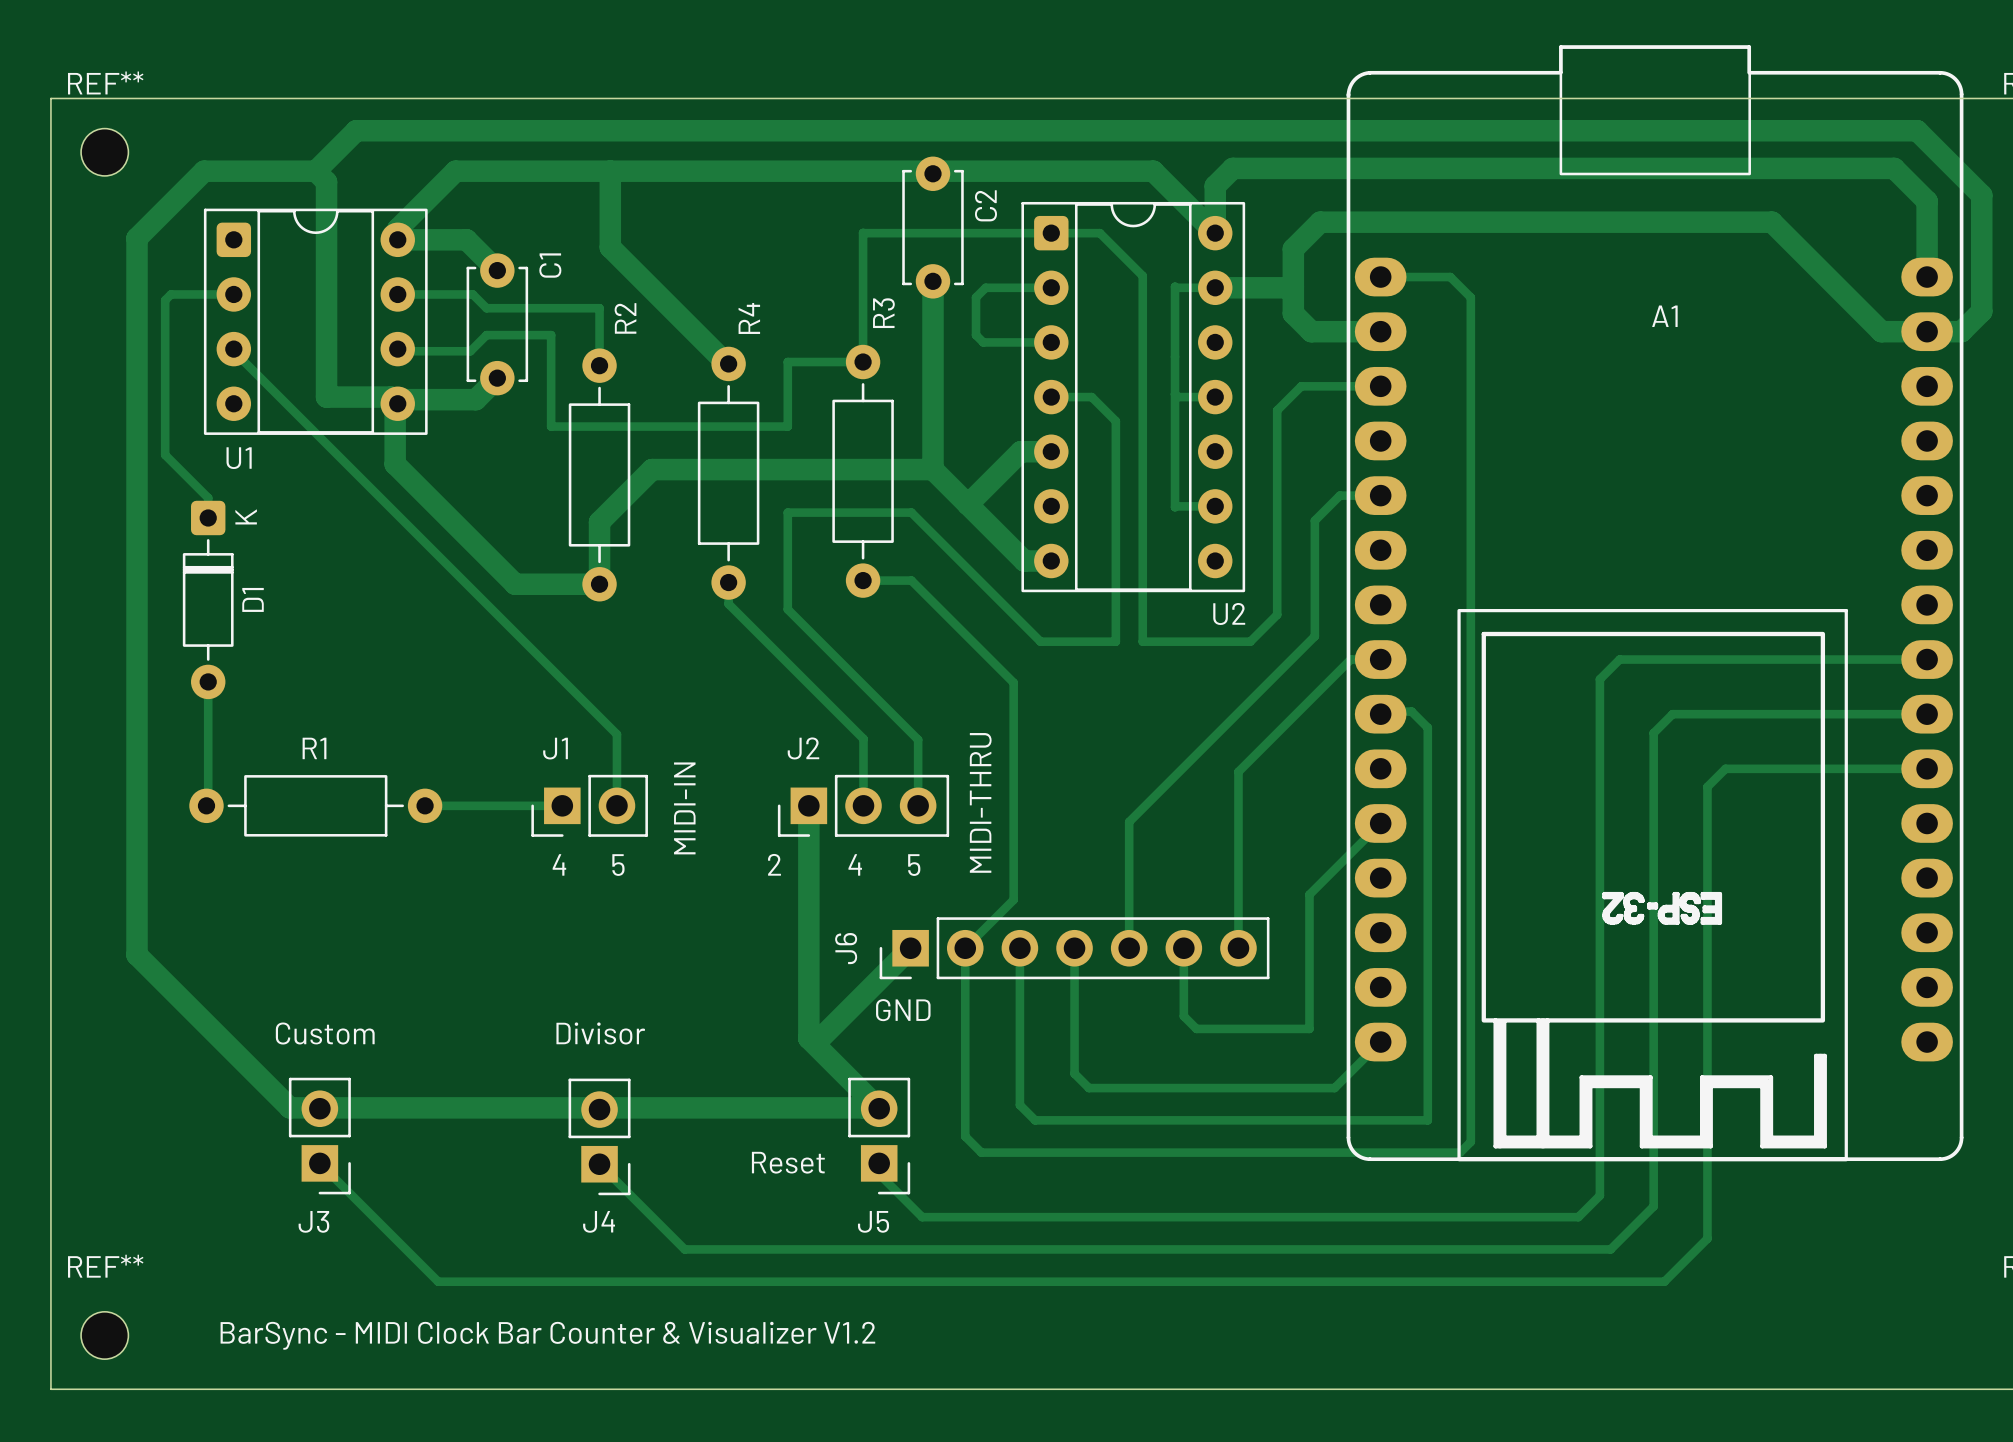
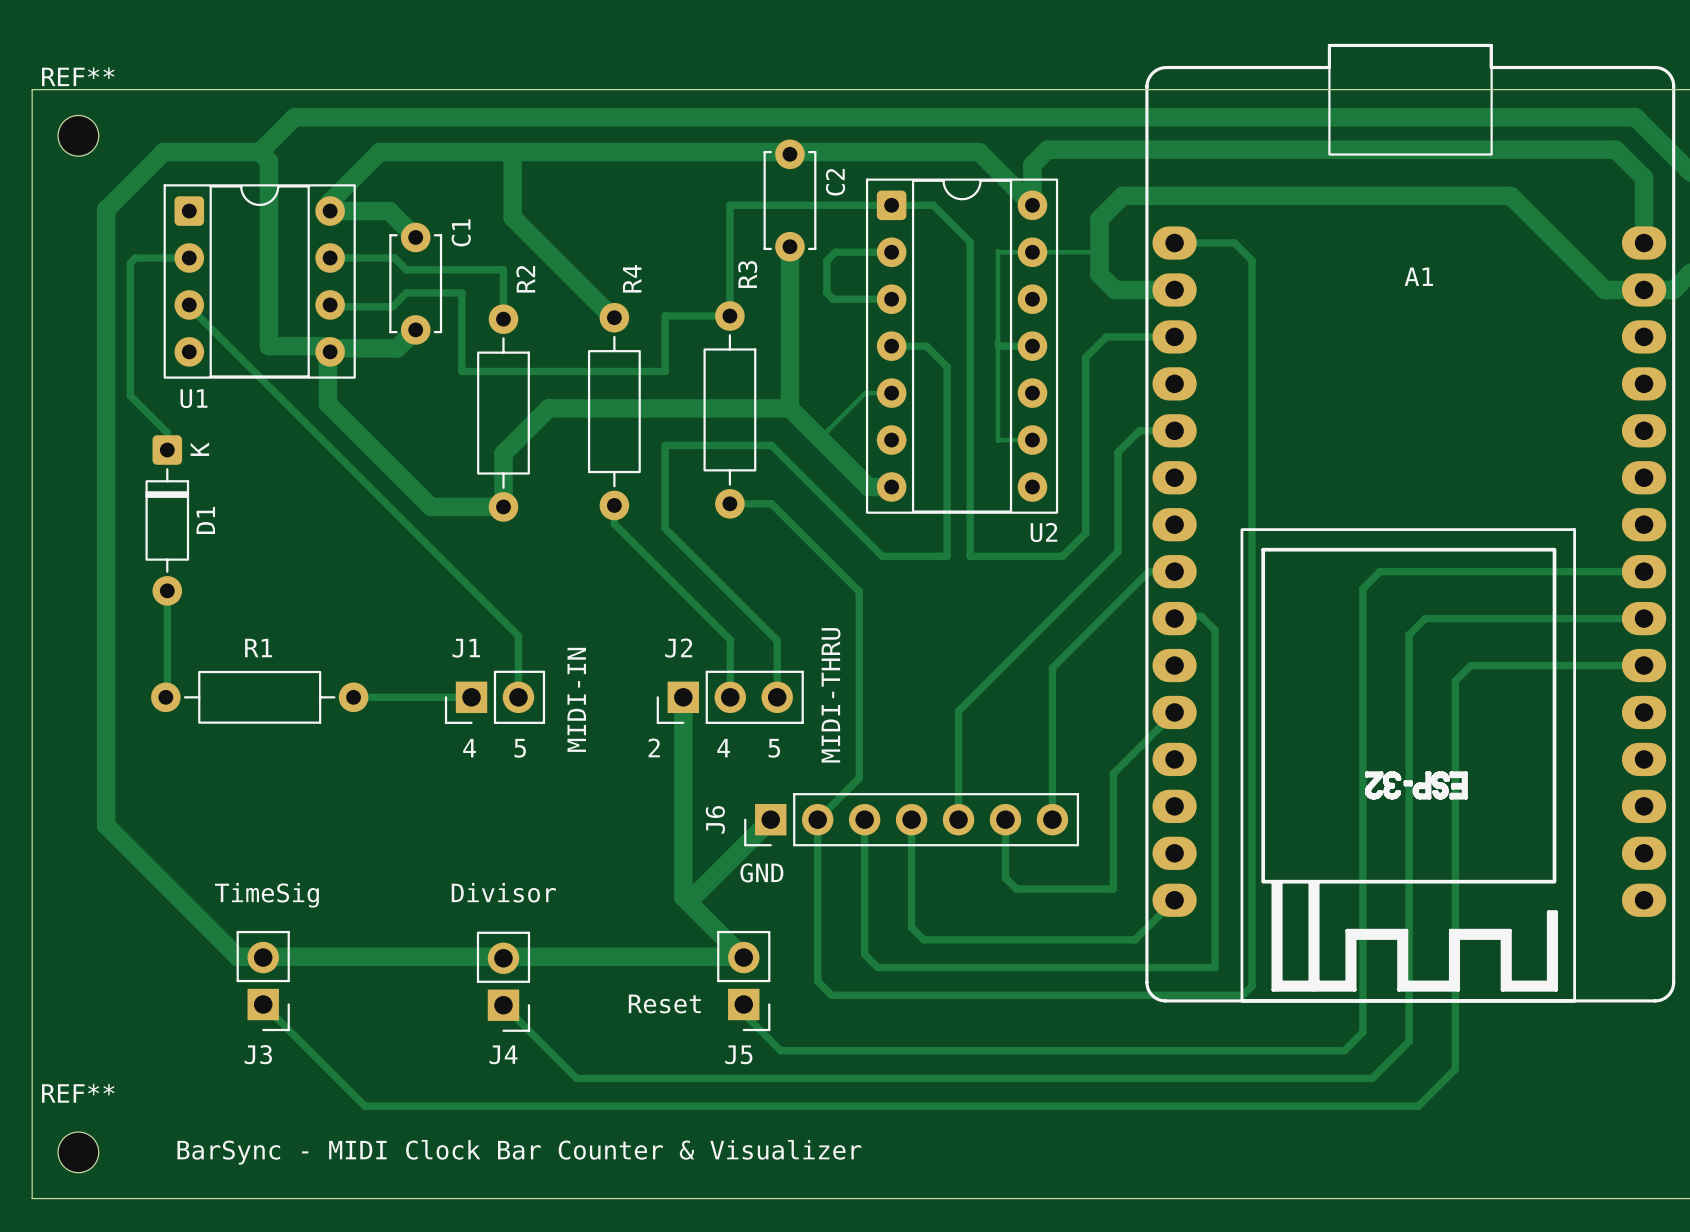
track width: thick (1292, 287) (1175, 286) (1175, 507) (1215, 506) -> thin (1098, 252) (997, 251) (997, 440) (1032, 440)
track width: thick (1051, 451) (1020, 451) (967, 504) -> thin (891, 393) (865, 393) (820, 438)
J3 value: Custom (325, 1033) -> TimeSig (266, 895)
text: BarSync - MIDI Clock Bar Counter & Visualizer V1.2 (547, 1335) -> BarSync - MIDI Clock Bar Counter & Visualizer (519, 1152)

